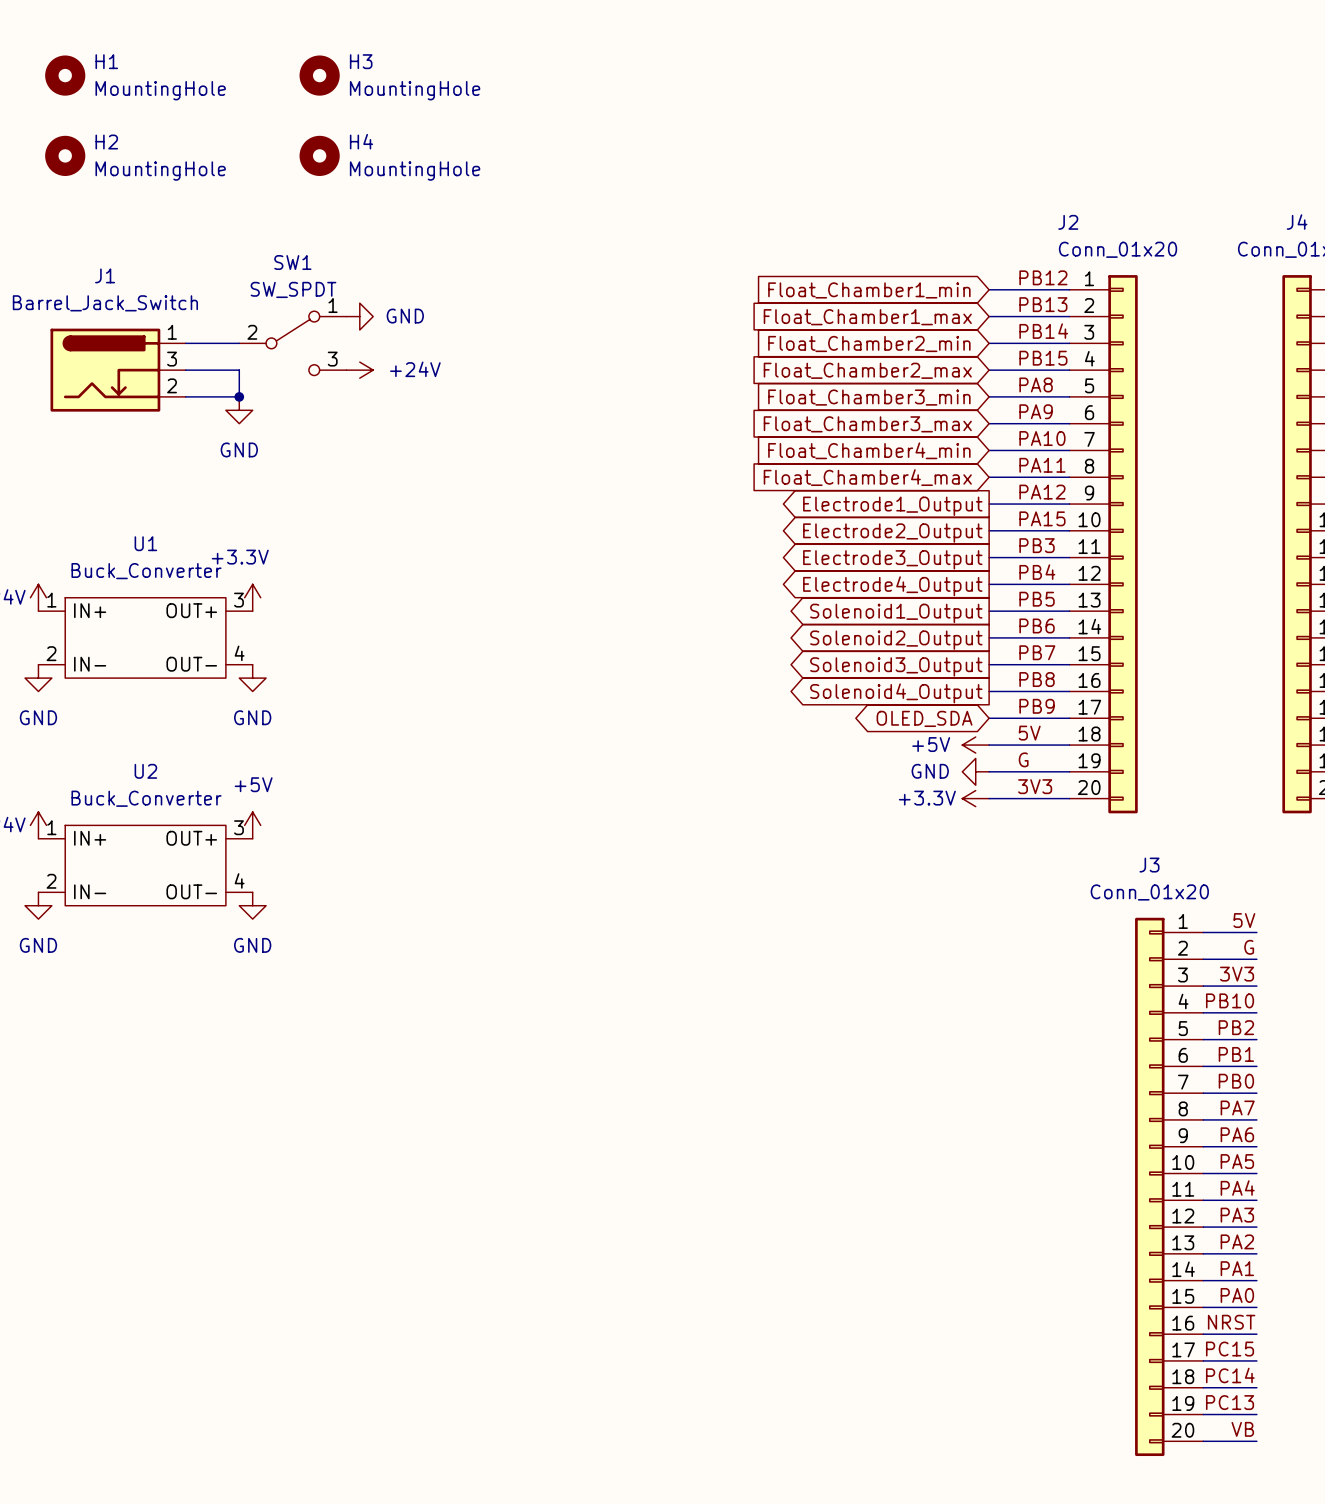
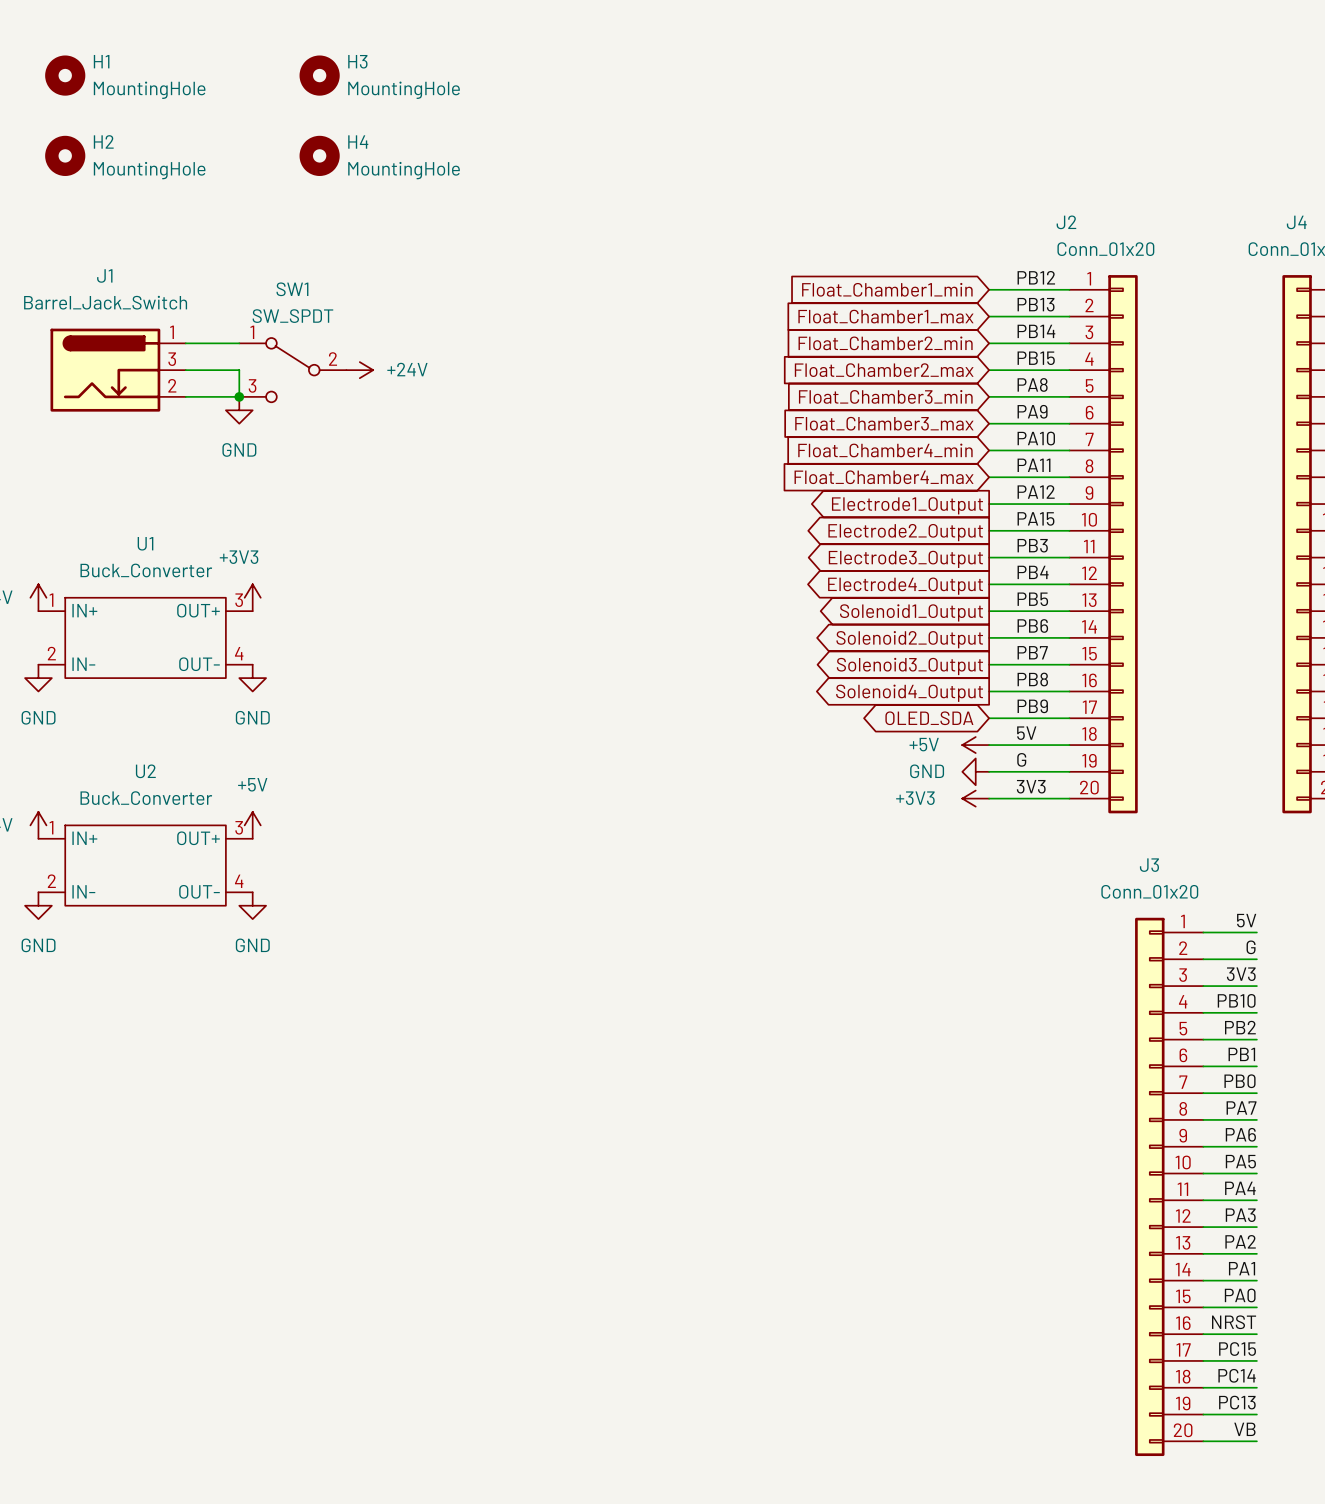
power symbol: GND (359, 316) -> none
SW1 flip: as is (292, 343) -> left-right (292, 370)
power symbol: +3.3V (252, 597) -> +3V3 (252, 597)
power symbol: +3.3V (975, 798) -> +3V3 (975, 798)

